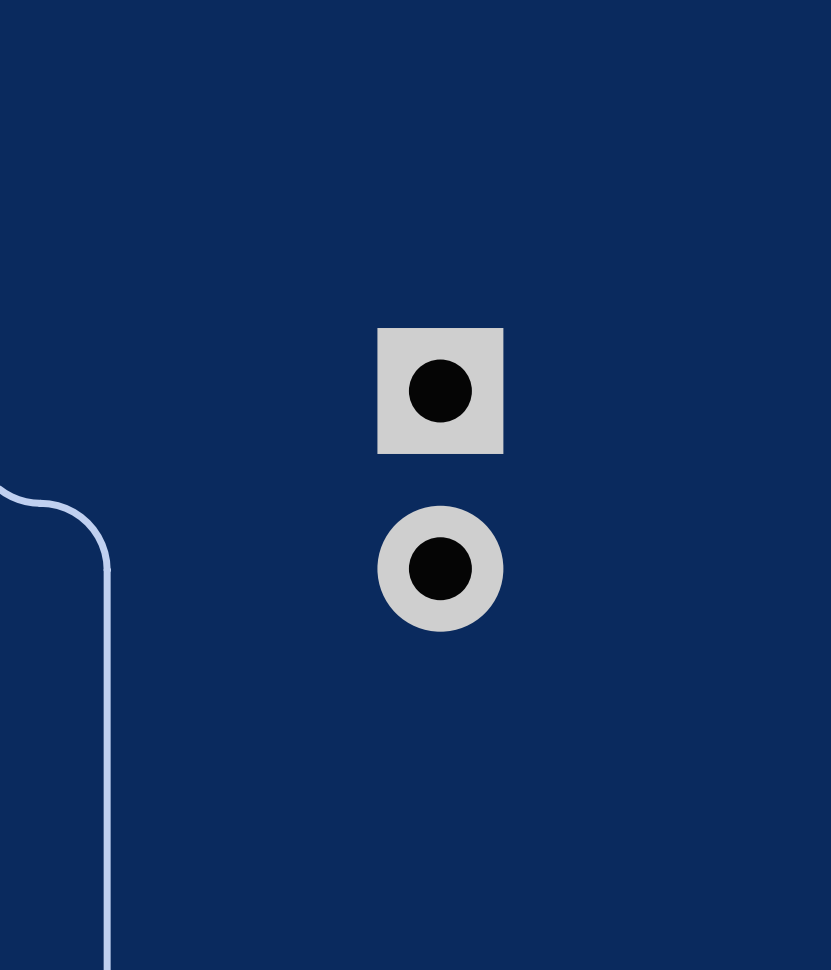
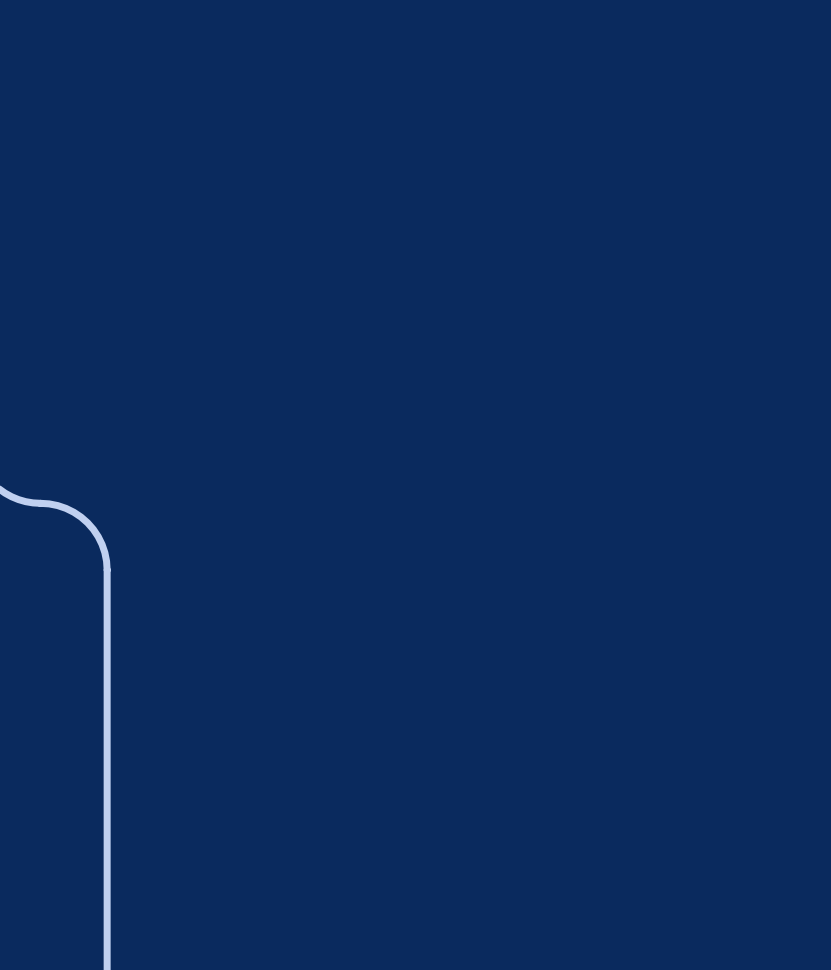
part: (440, 479) -> none

